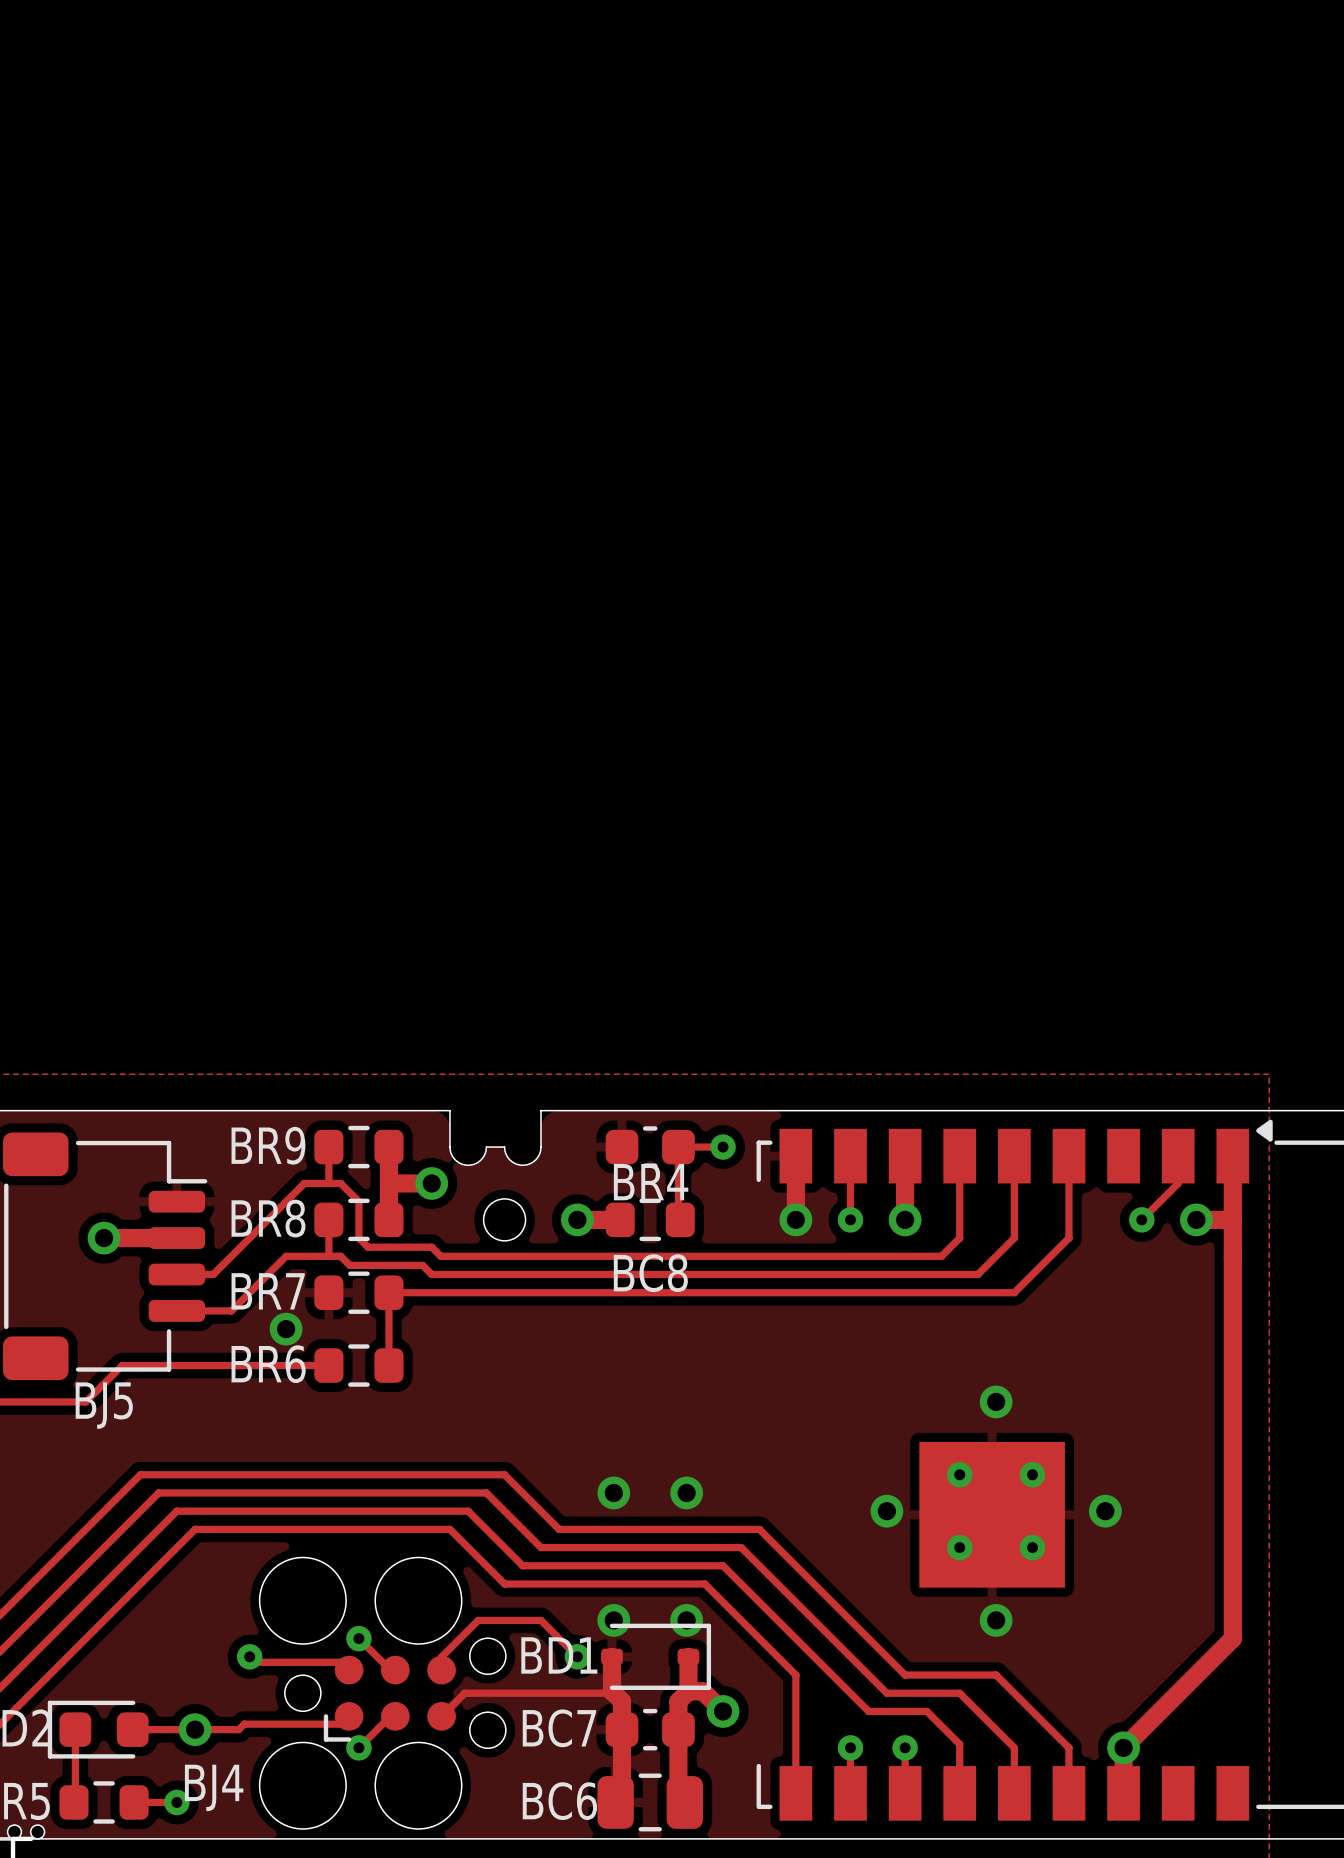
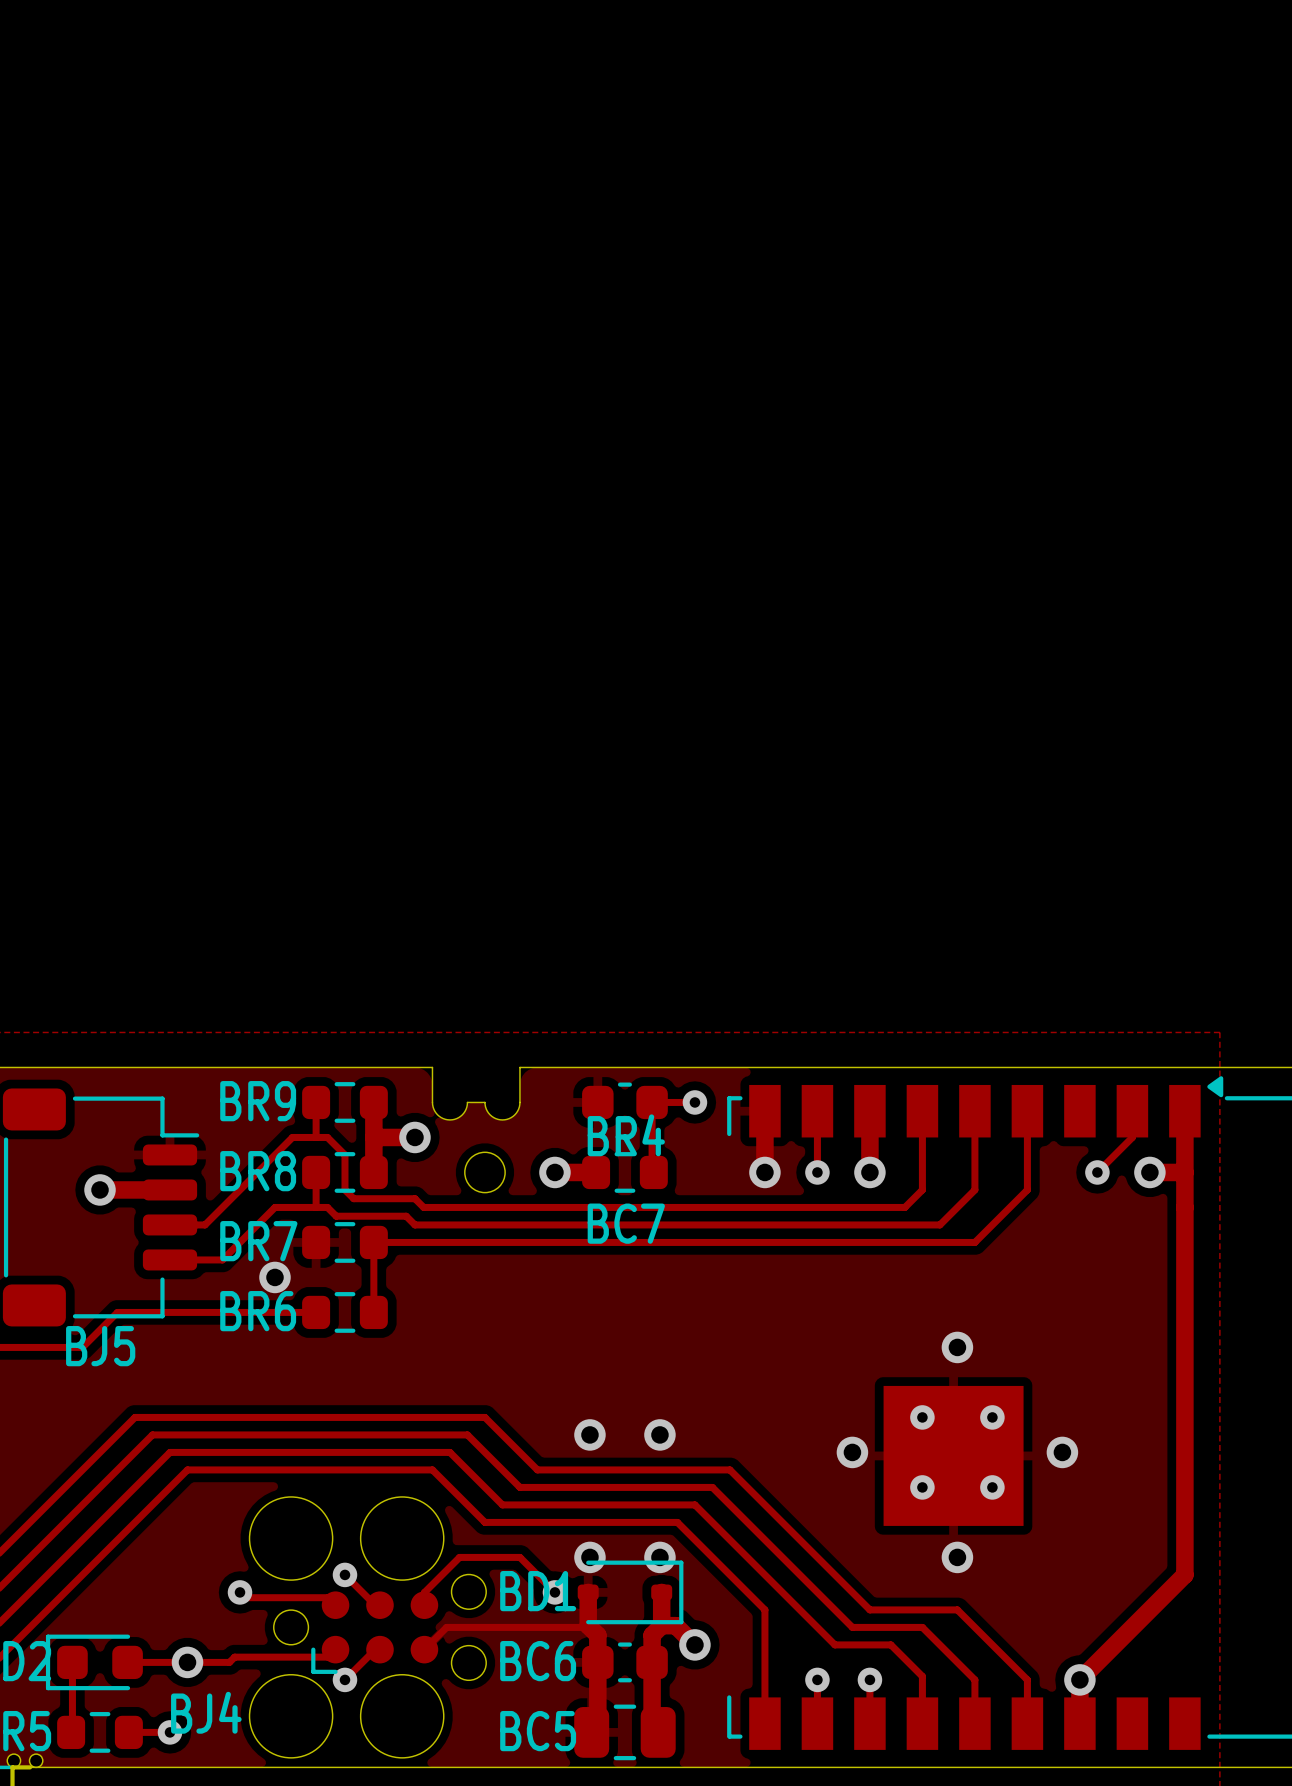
BC8 name: BC8 (650, 1273) -> BC7 (626, 1223)
BC7 name: BC7 (559, 1728) -> BC6 (538, 1661)
BC6 name: BC6 (559, 1801) -> BC5 (538, 1731)

